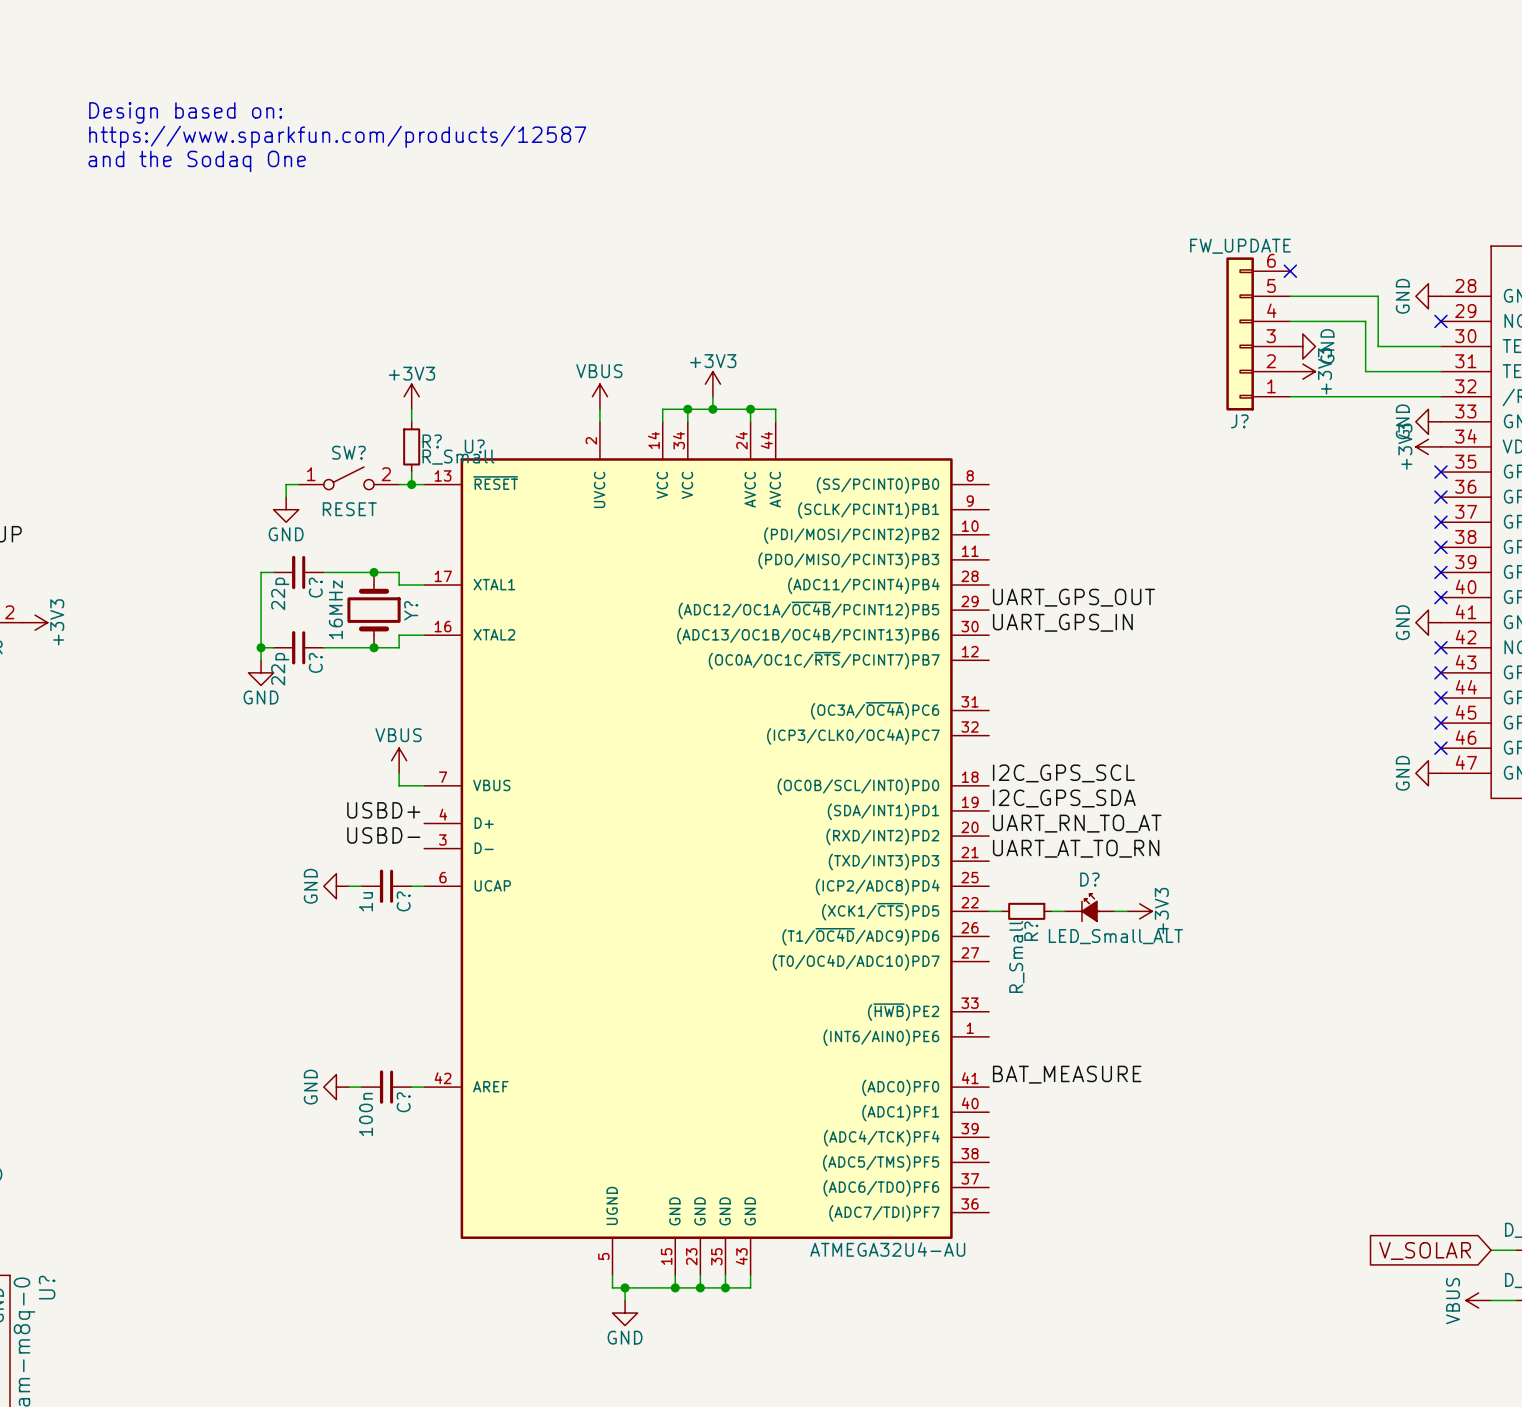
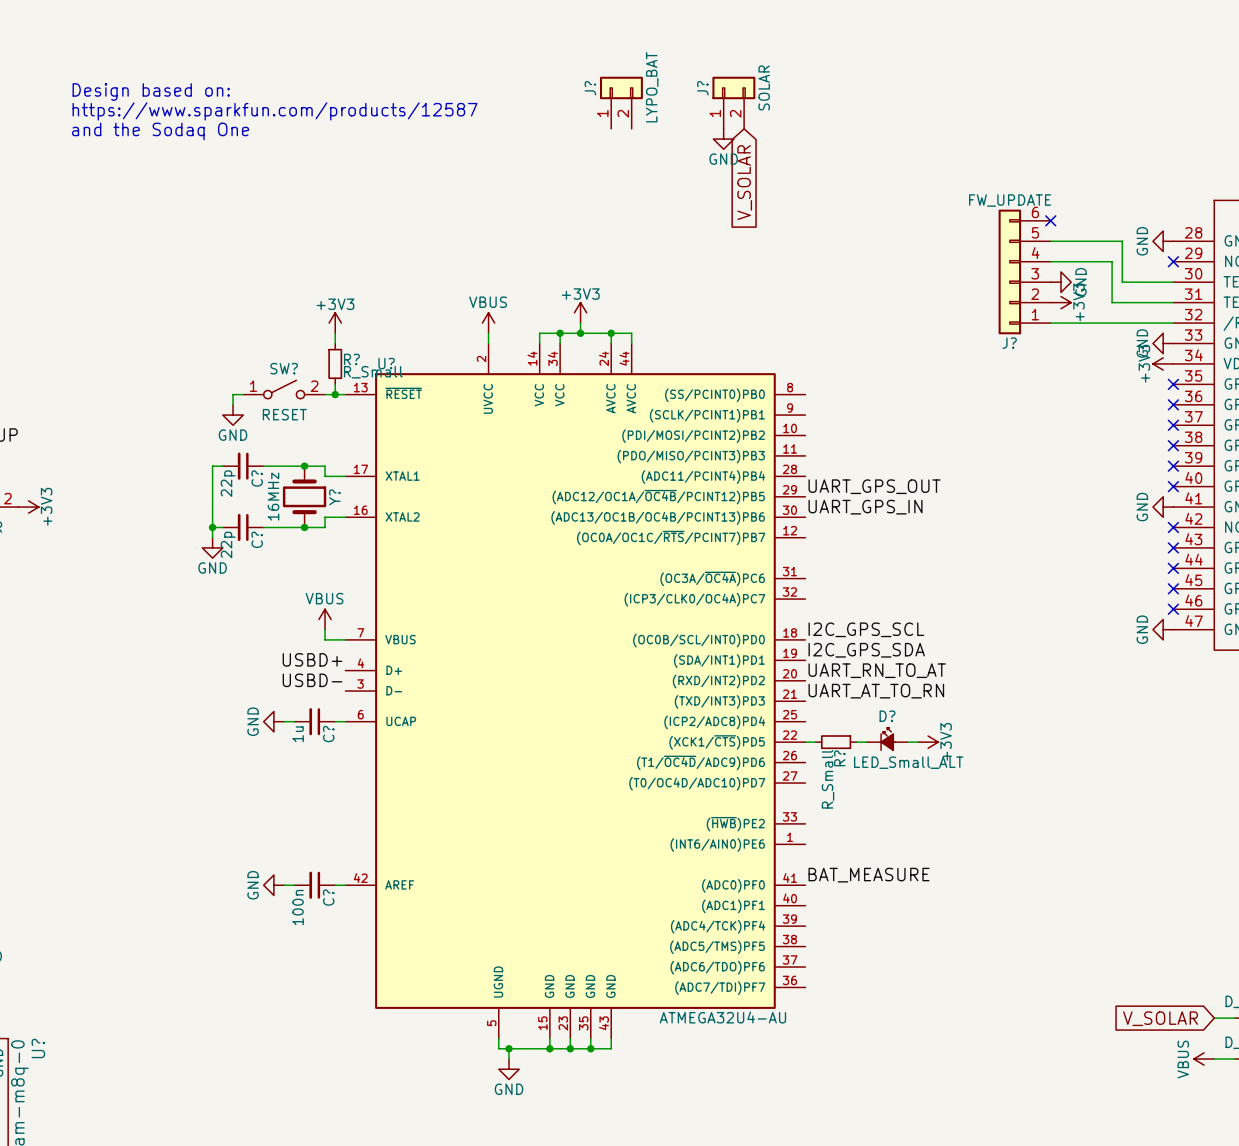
J?: none -> LYPO_BAT (621, 102)
J?: none -> SOLAR (733, 102)
power symbol: none -> GND (723, 139)
global label: none -> V_SOLAR (744, 182)

